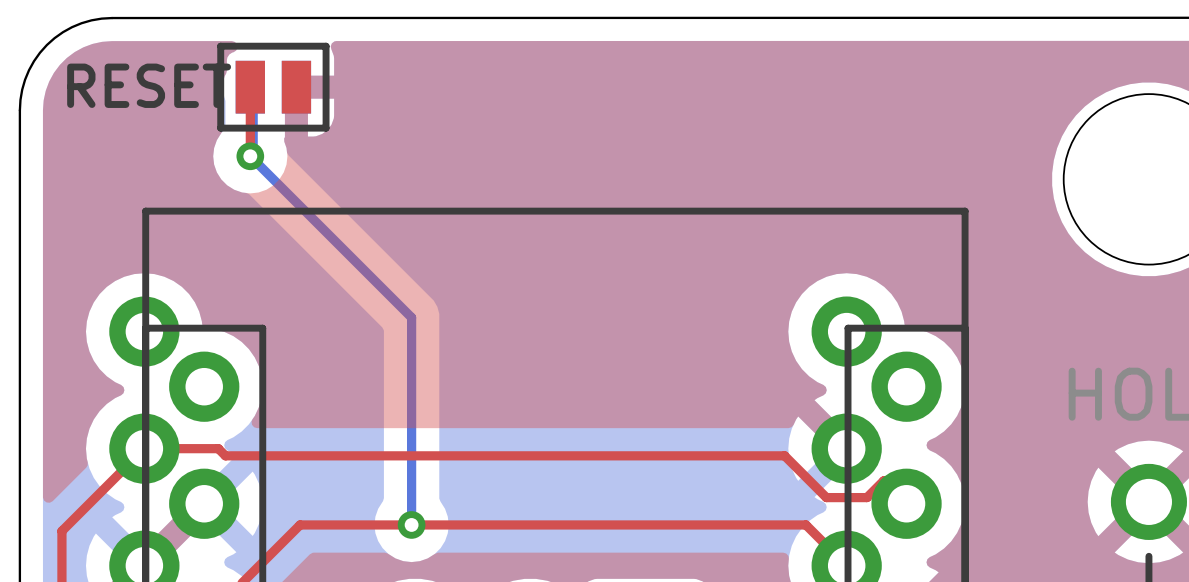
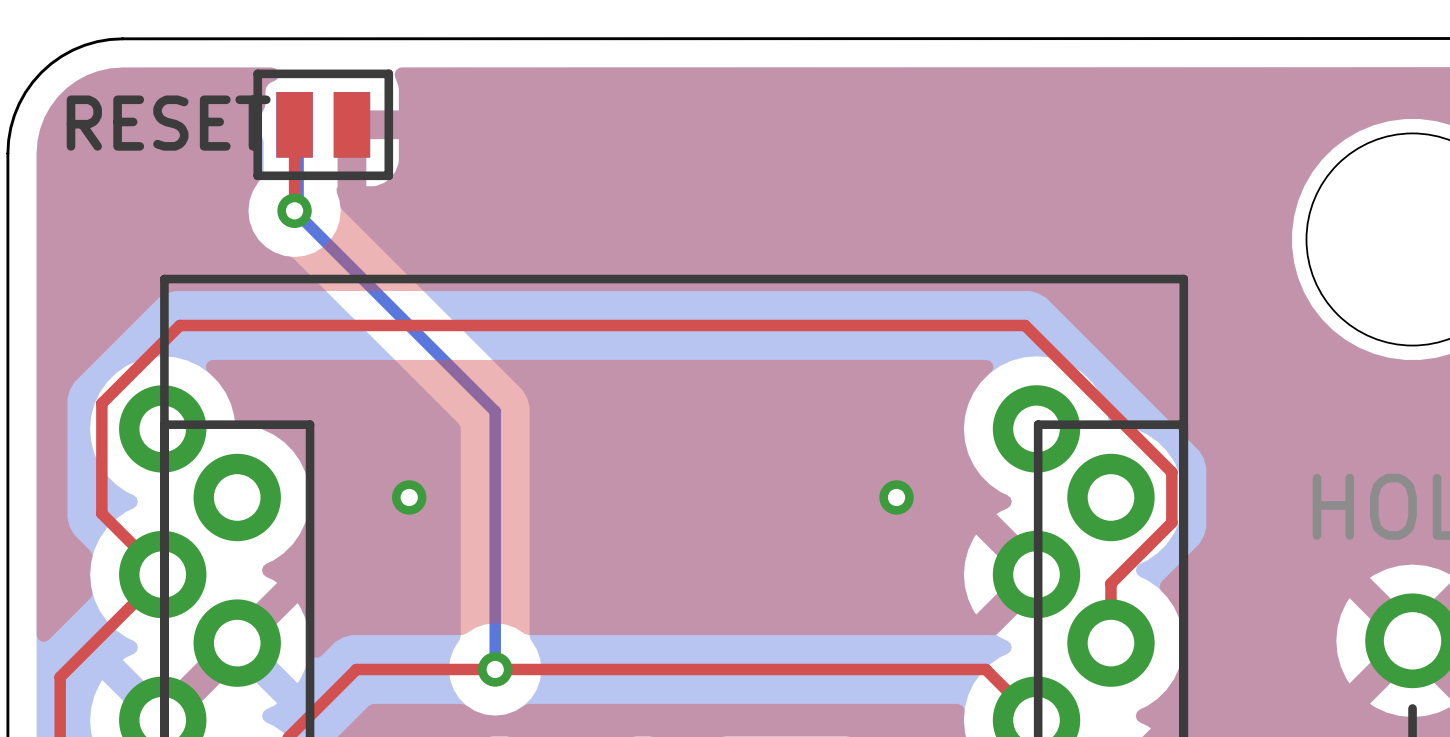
via: none -> (409, 497)
via: none -> (896, 497)
top track: (144, 448) (218, 448) (225, 455) (784, 455) (826, 497) (866, 497) (883, 480) (906, 503) -> (162, 574) (101, 513) (101, 403) (179, 325) (1025, 325) (1171, 472) (1171, 522) (1110, 583) (1110, 643)

